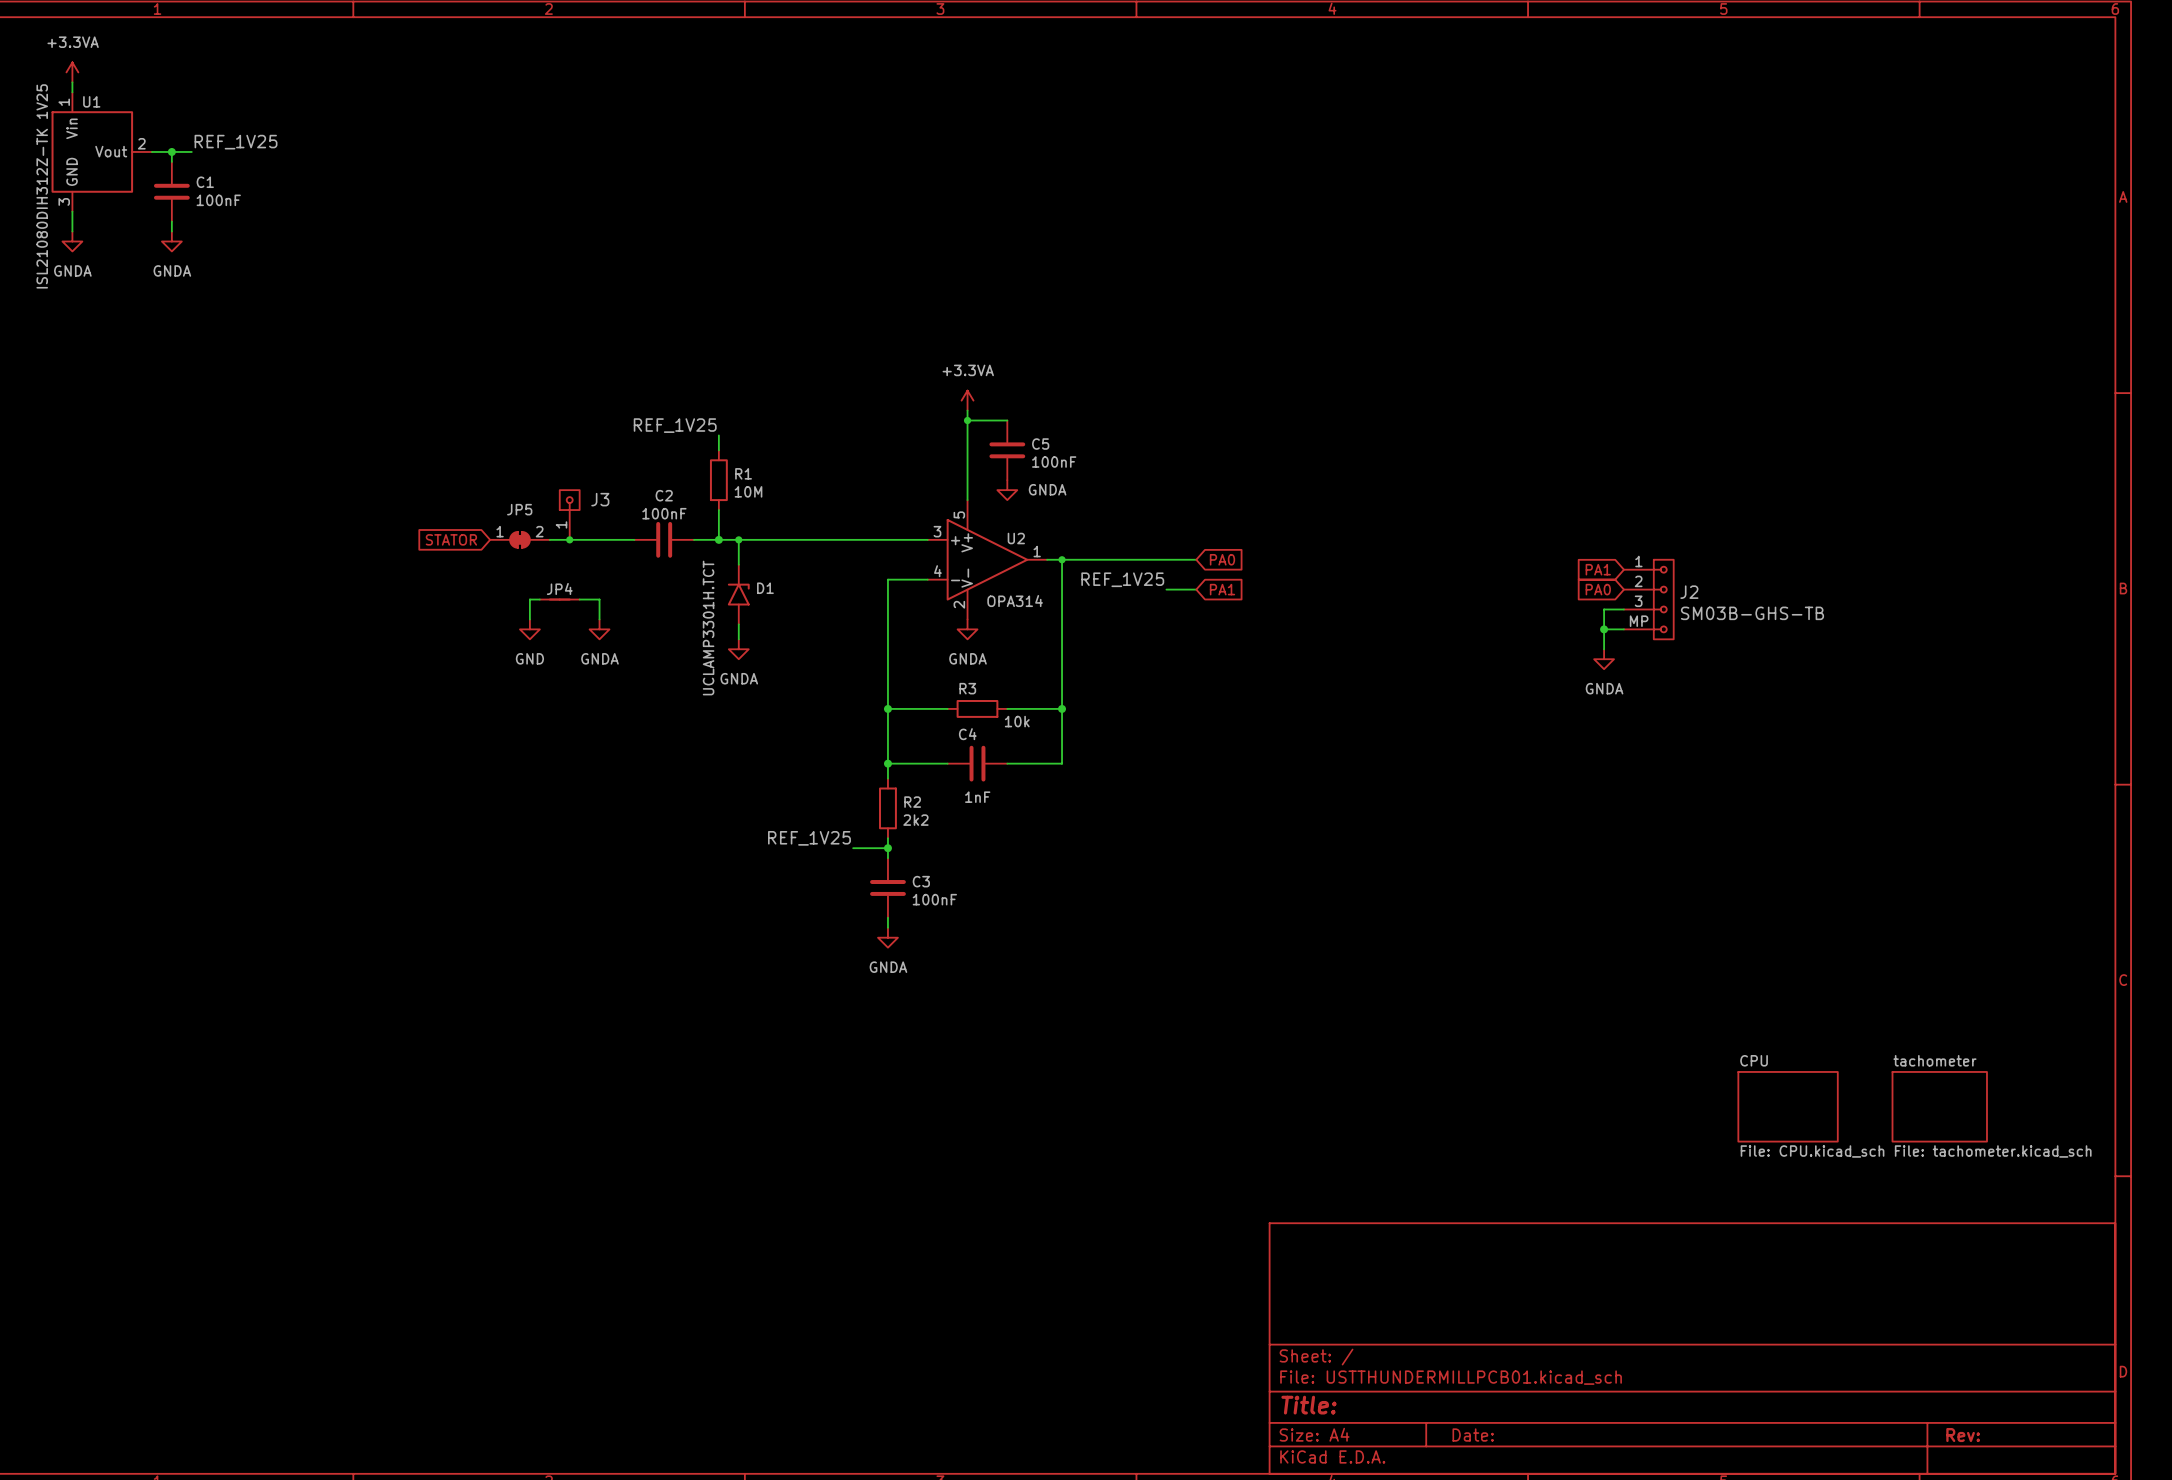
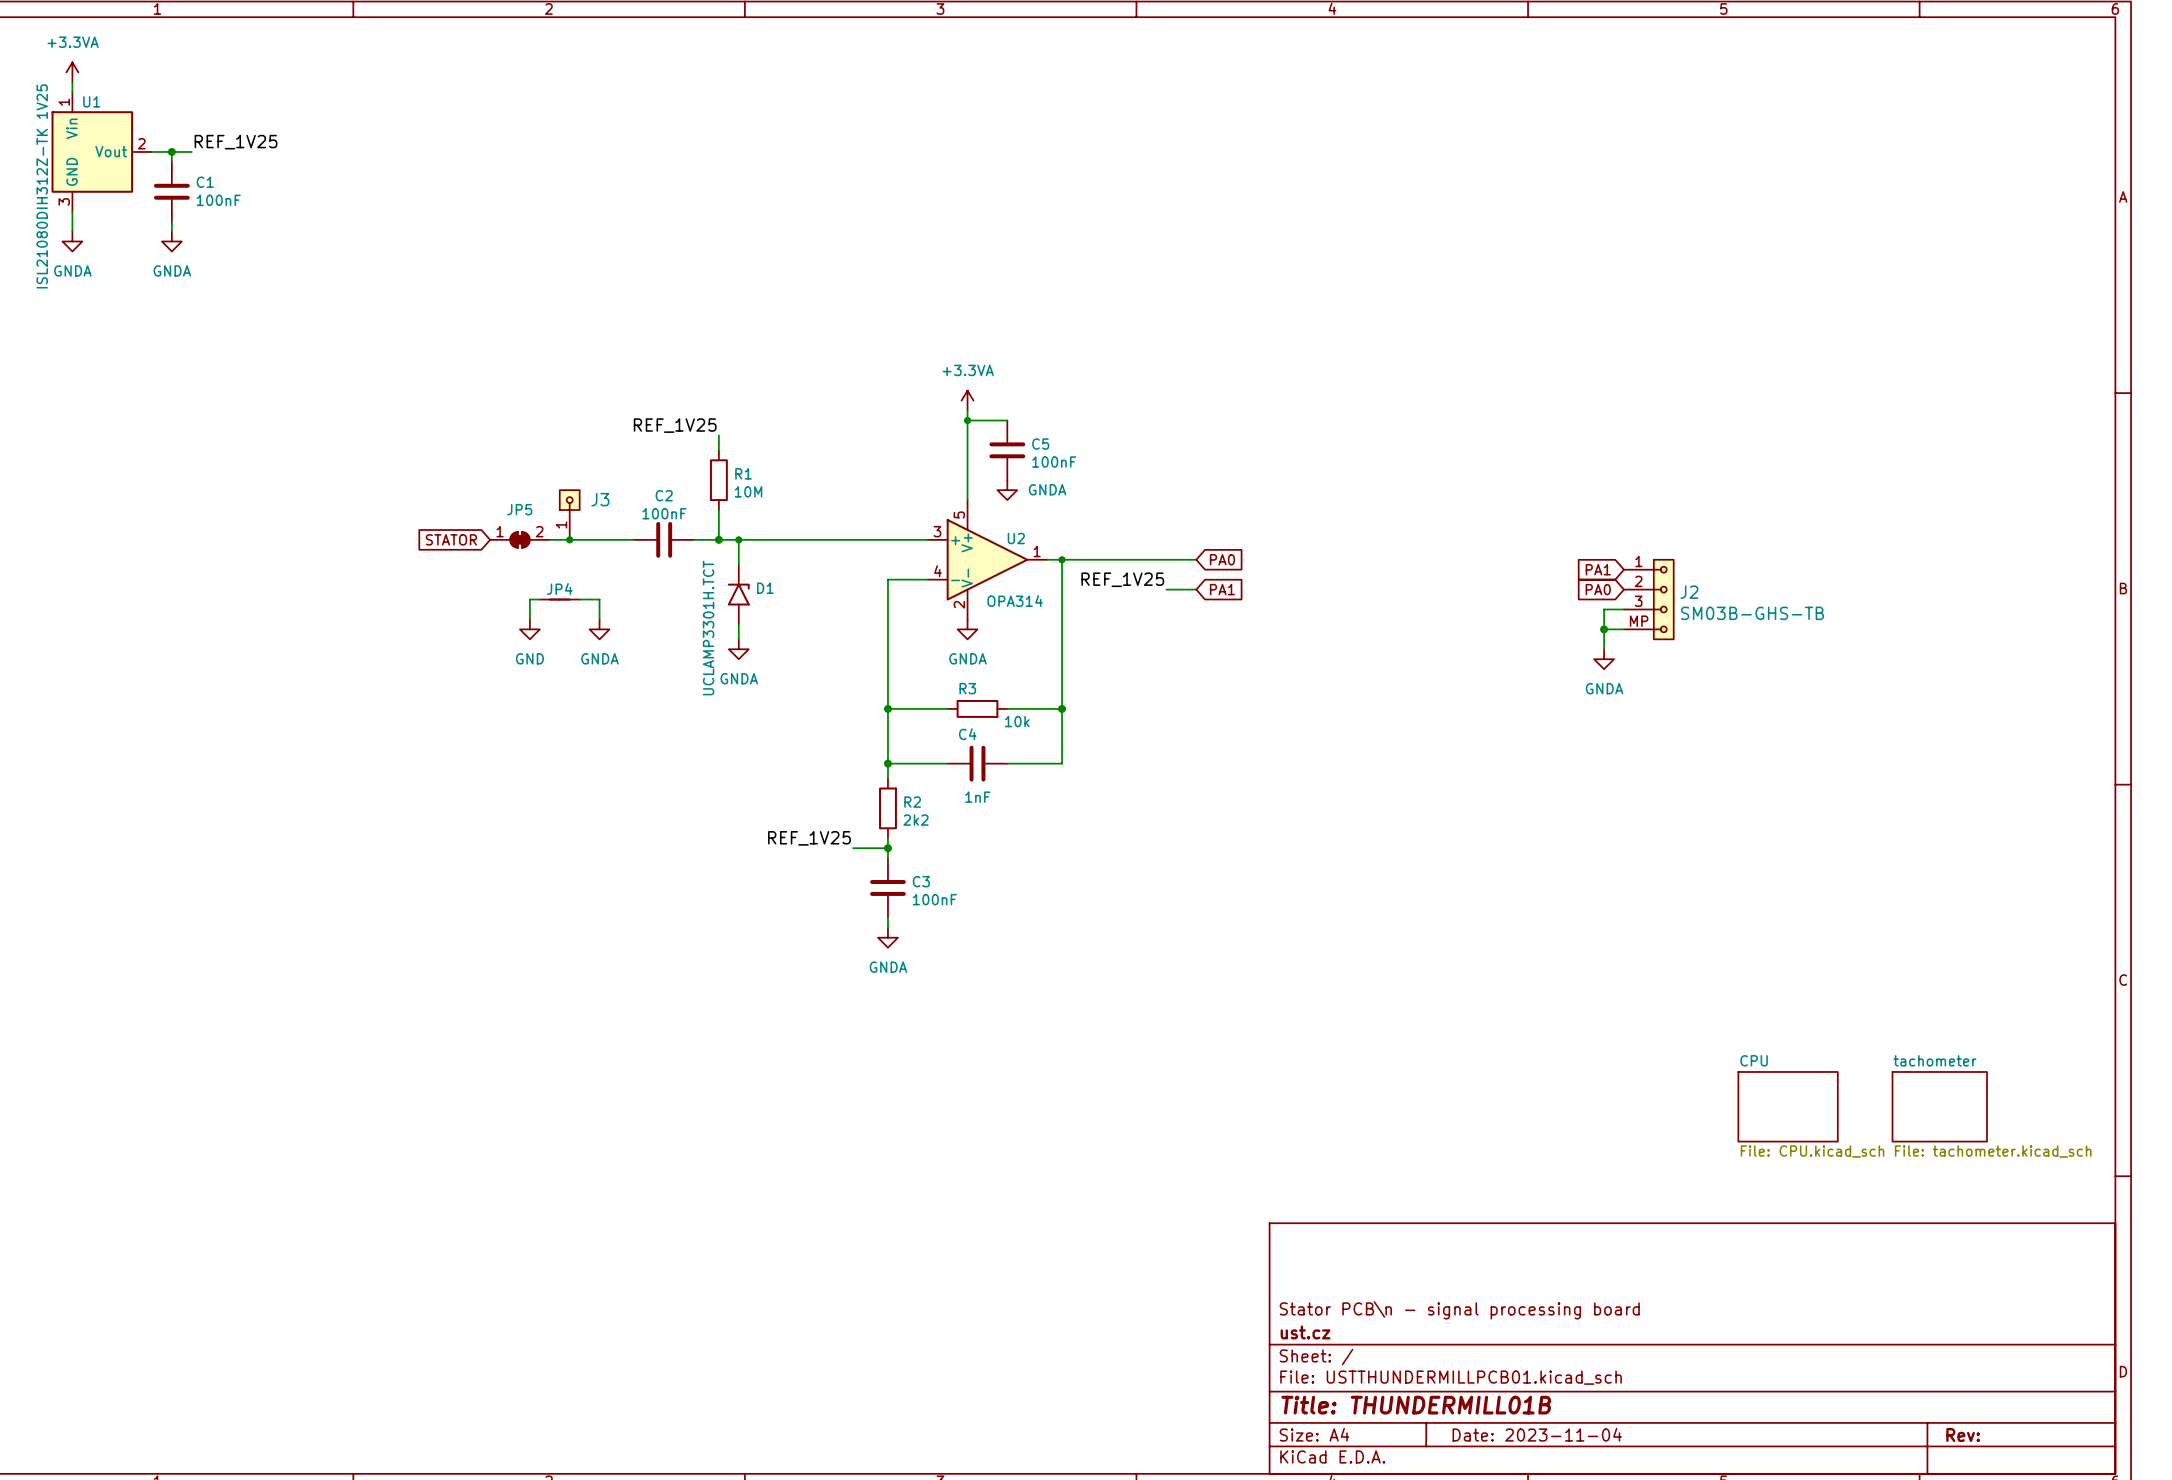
title block: none -> Stator PCB\n - signal processing board (1459, 1310)
title block: none -> ust.cz (1305, 1332)
title block: Title: (1308, 1405) -> Title: THUNDERMILL01B (1416, 1405)
title block: Date: (1473, 1435) -> Date: 2023-11-04 (1537, 1434)

